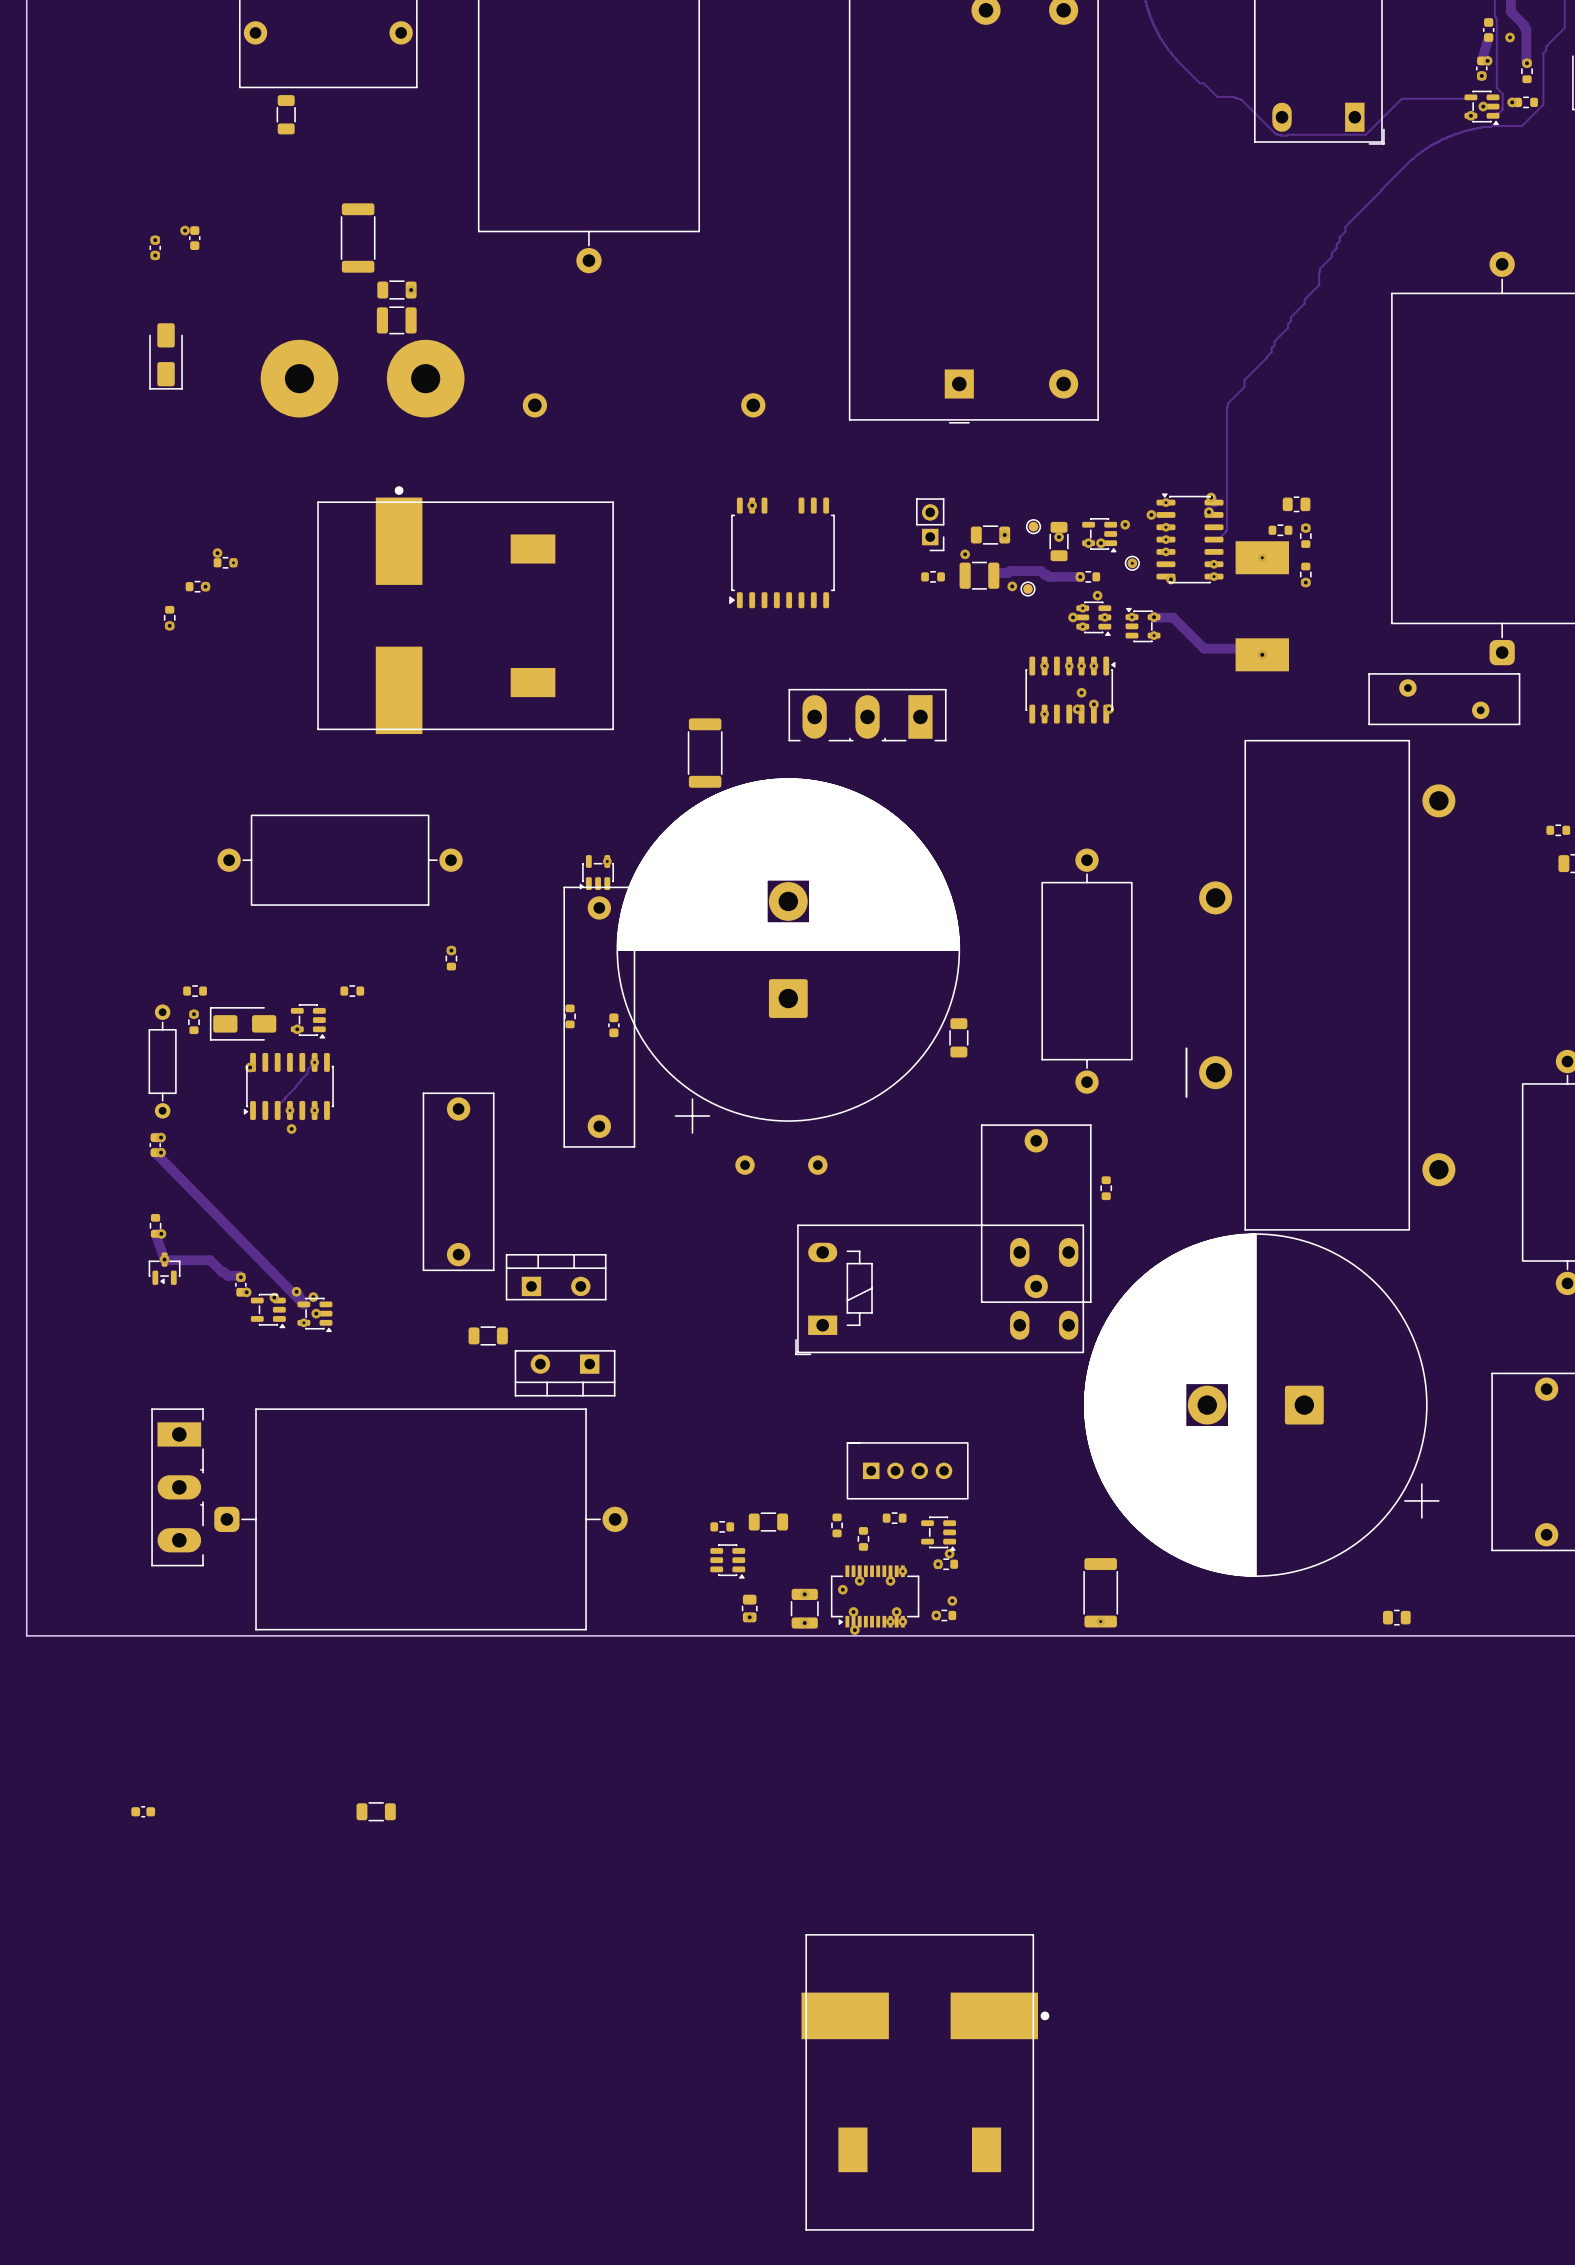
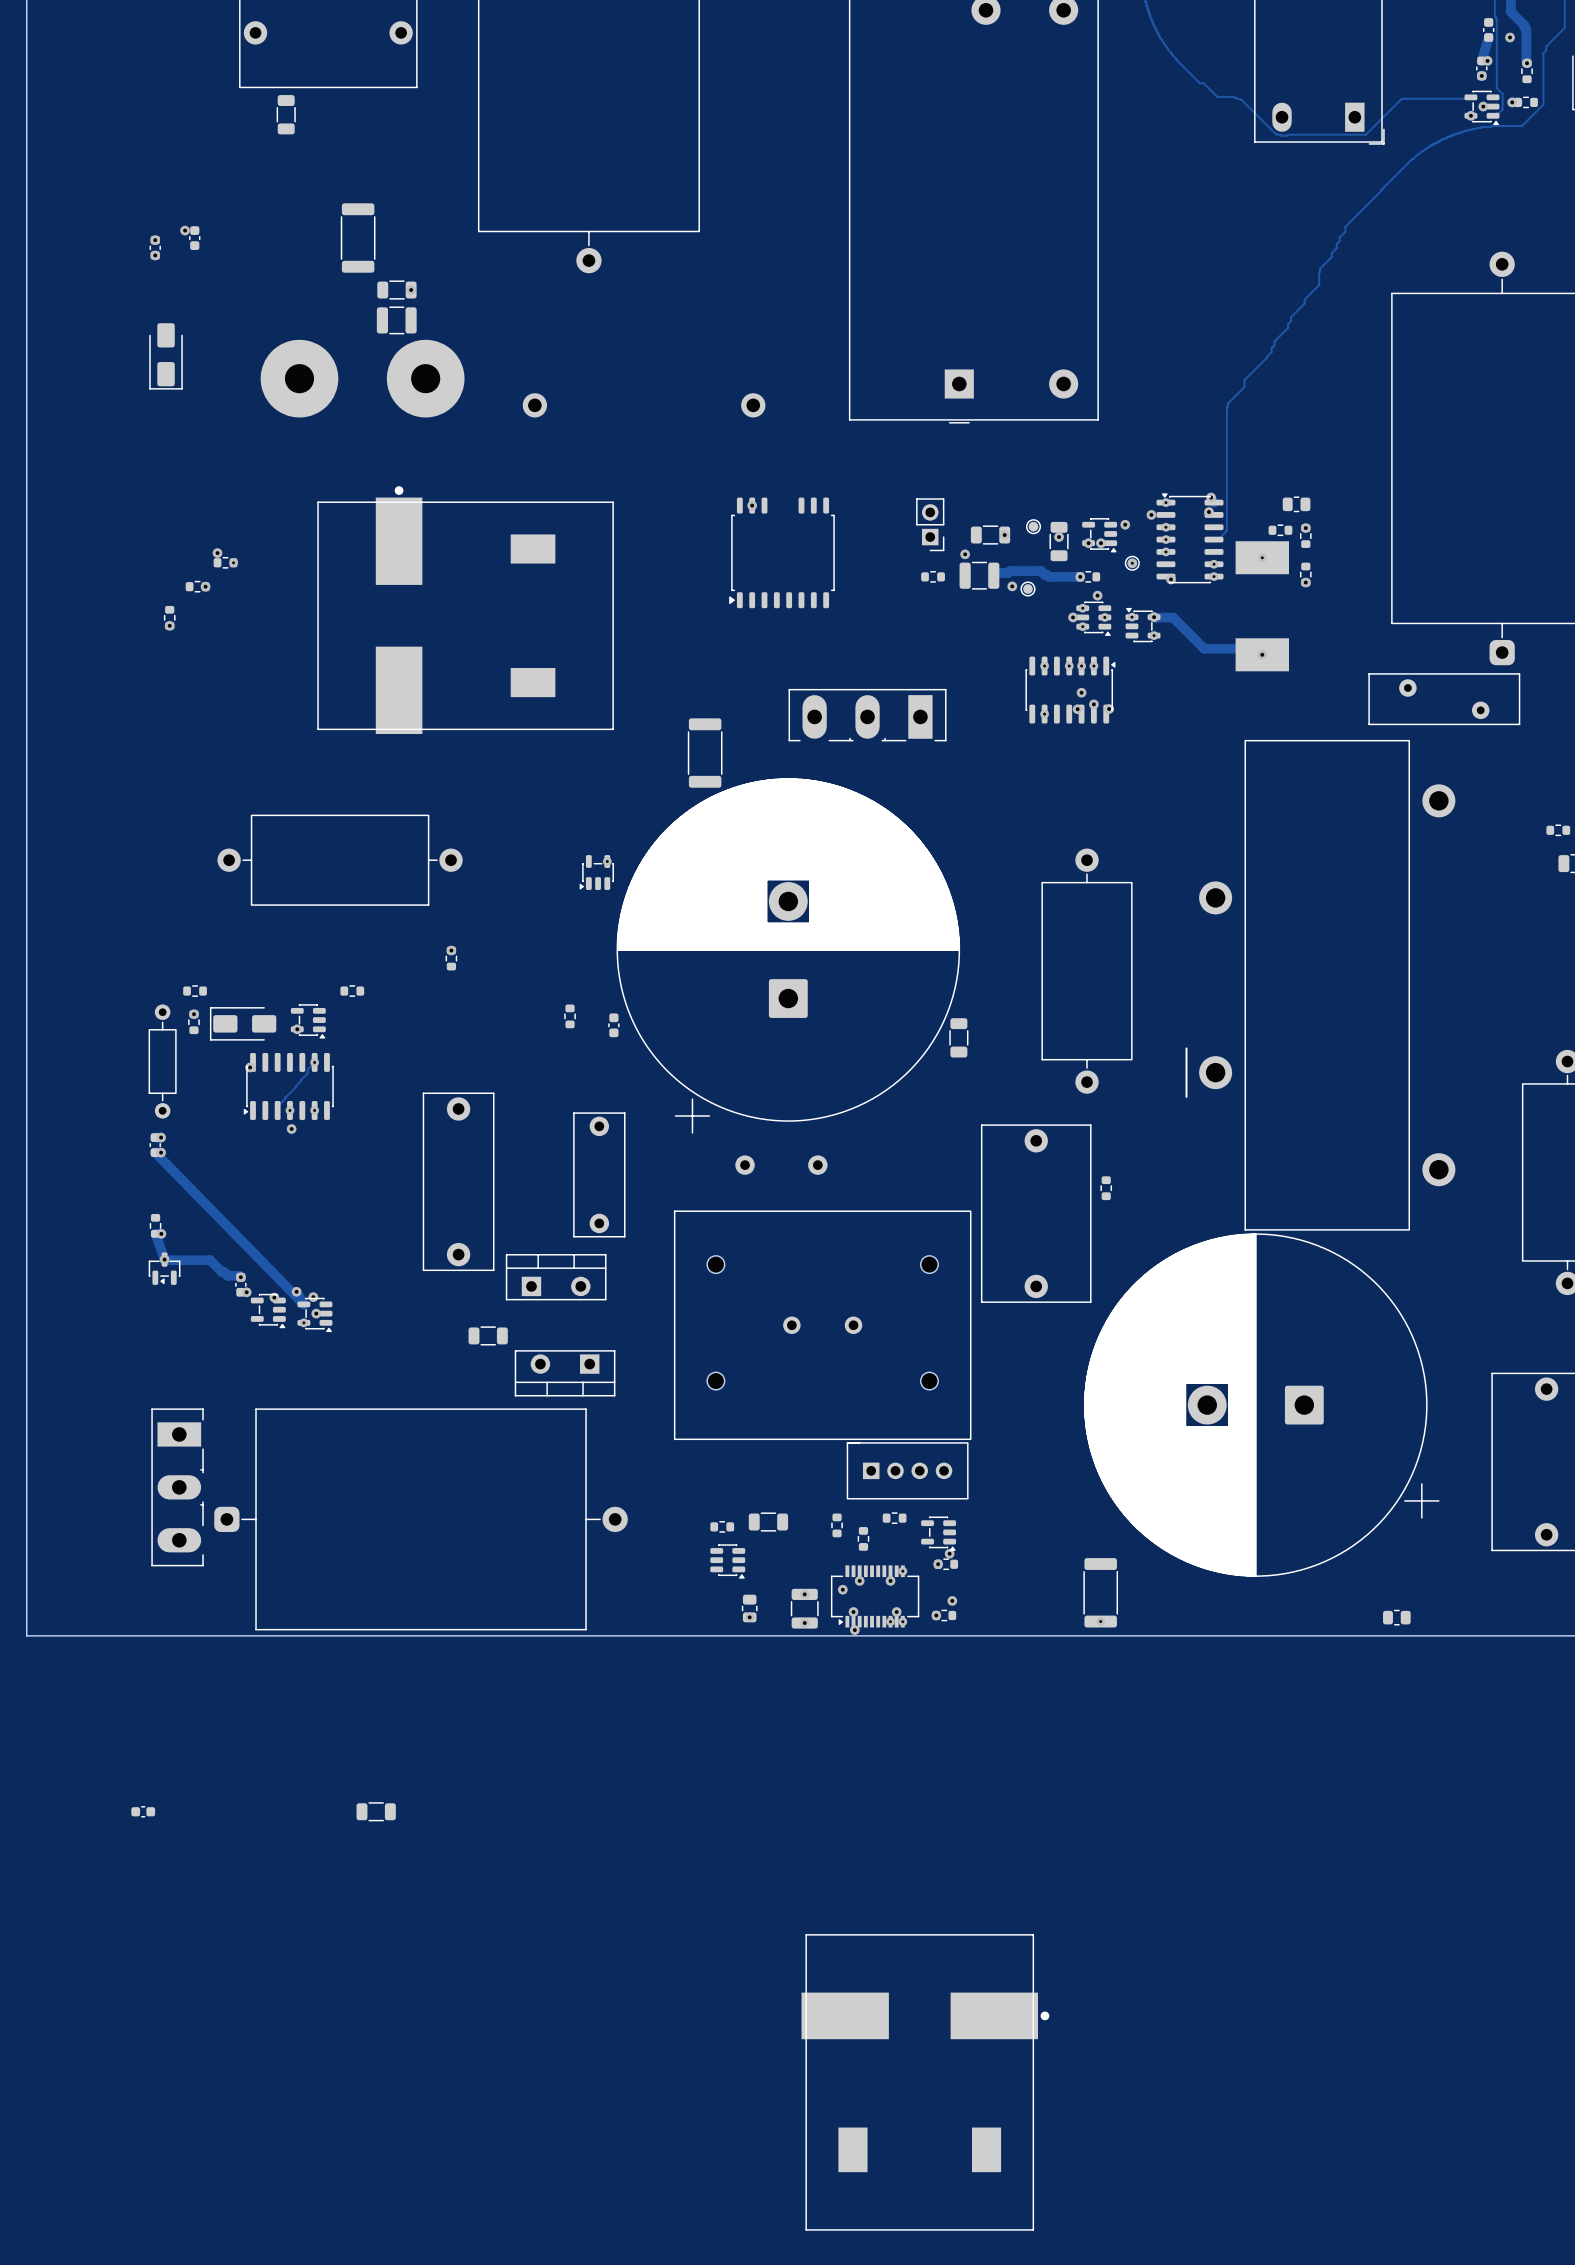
part: (599, 1017) -> none
part: none -> (599, 1174)
part: (939, 1289) -> none
part: none -> (822, 1325)

